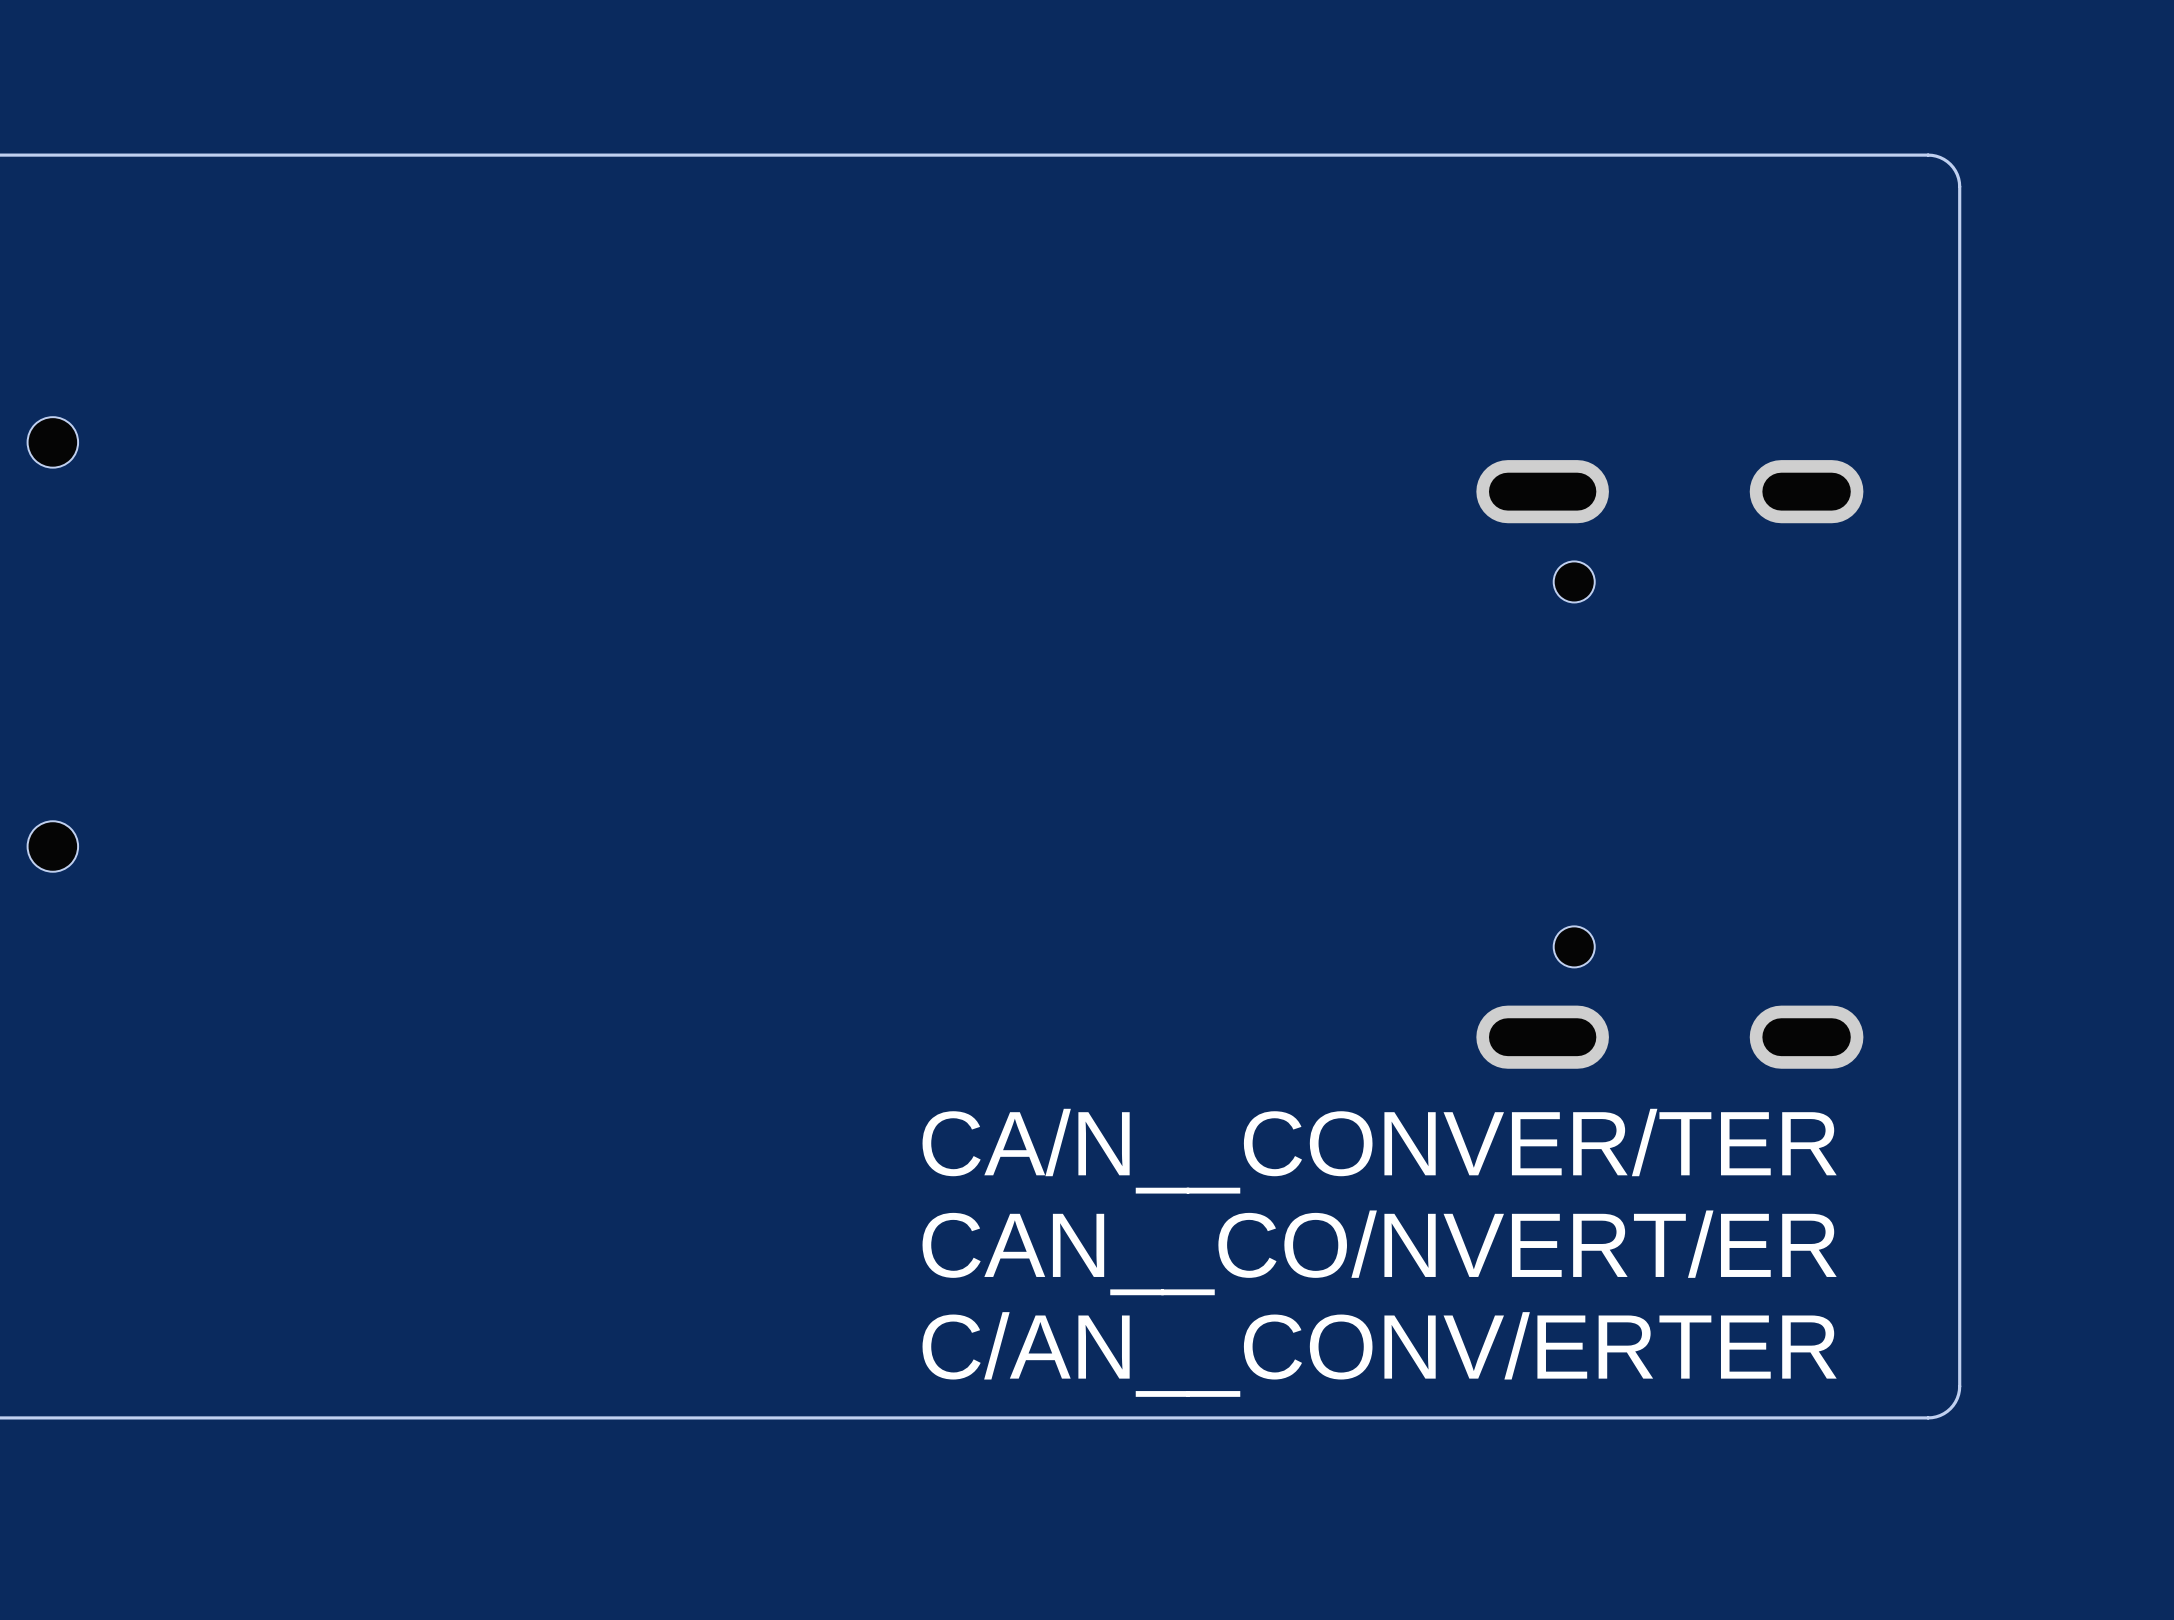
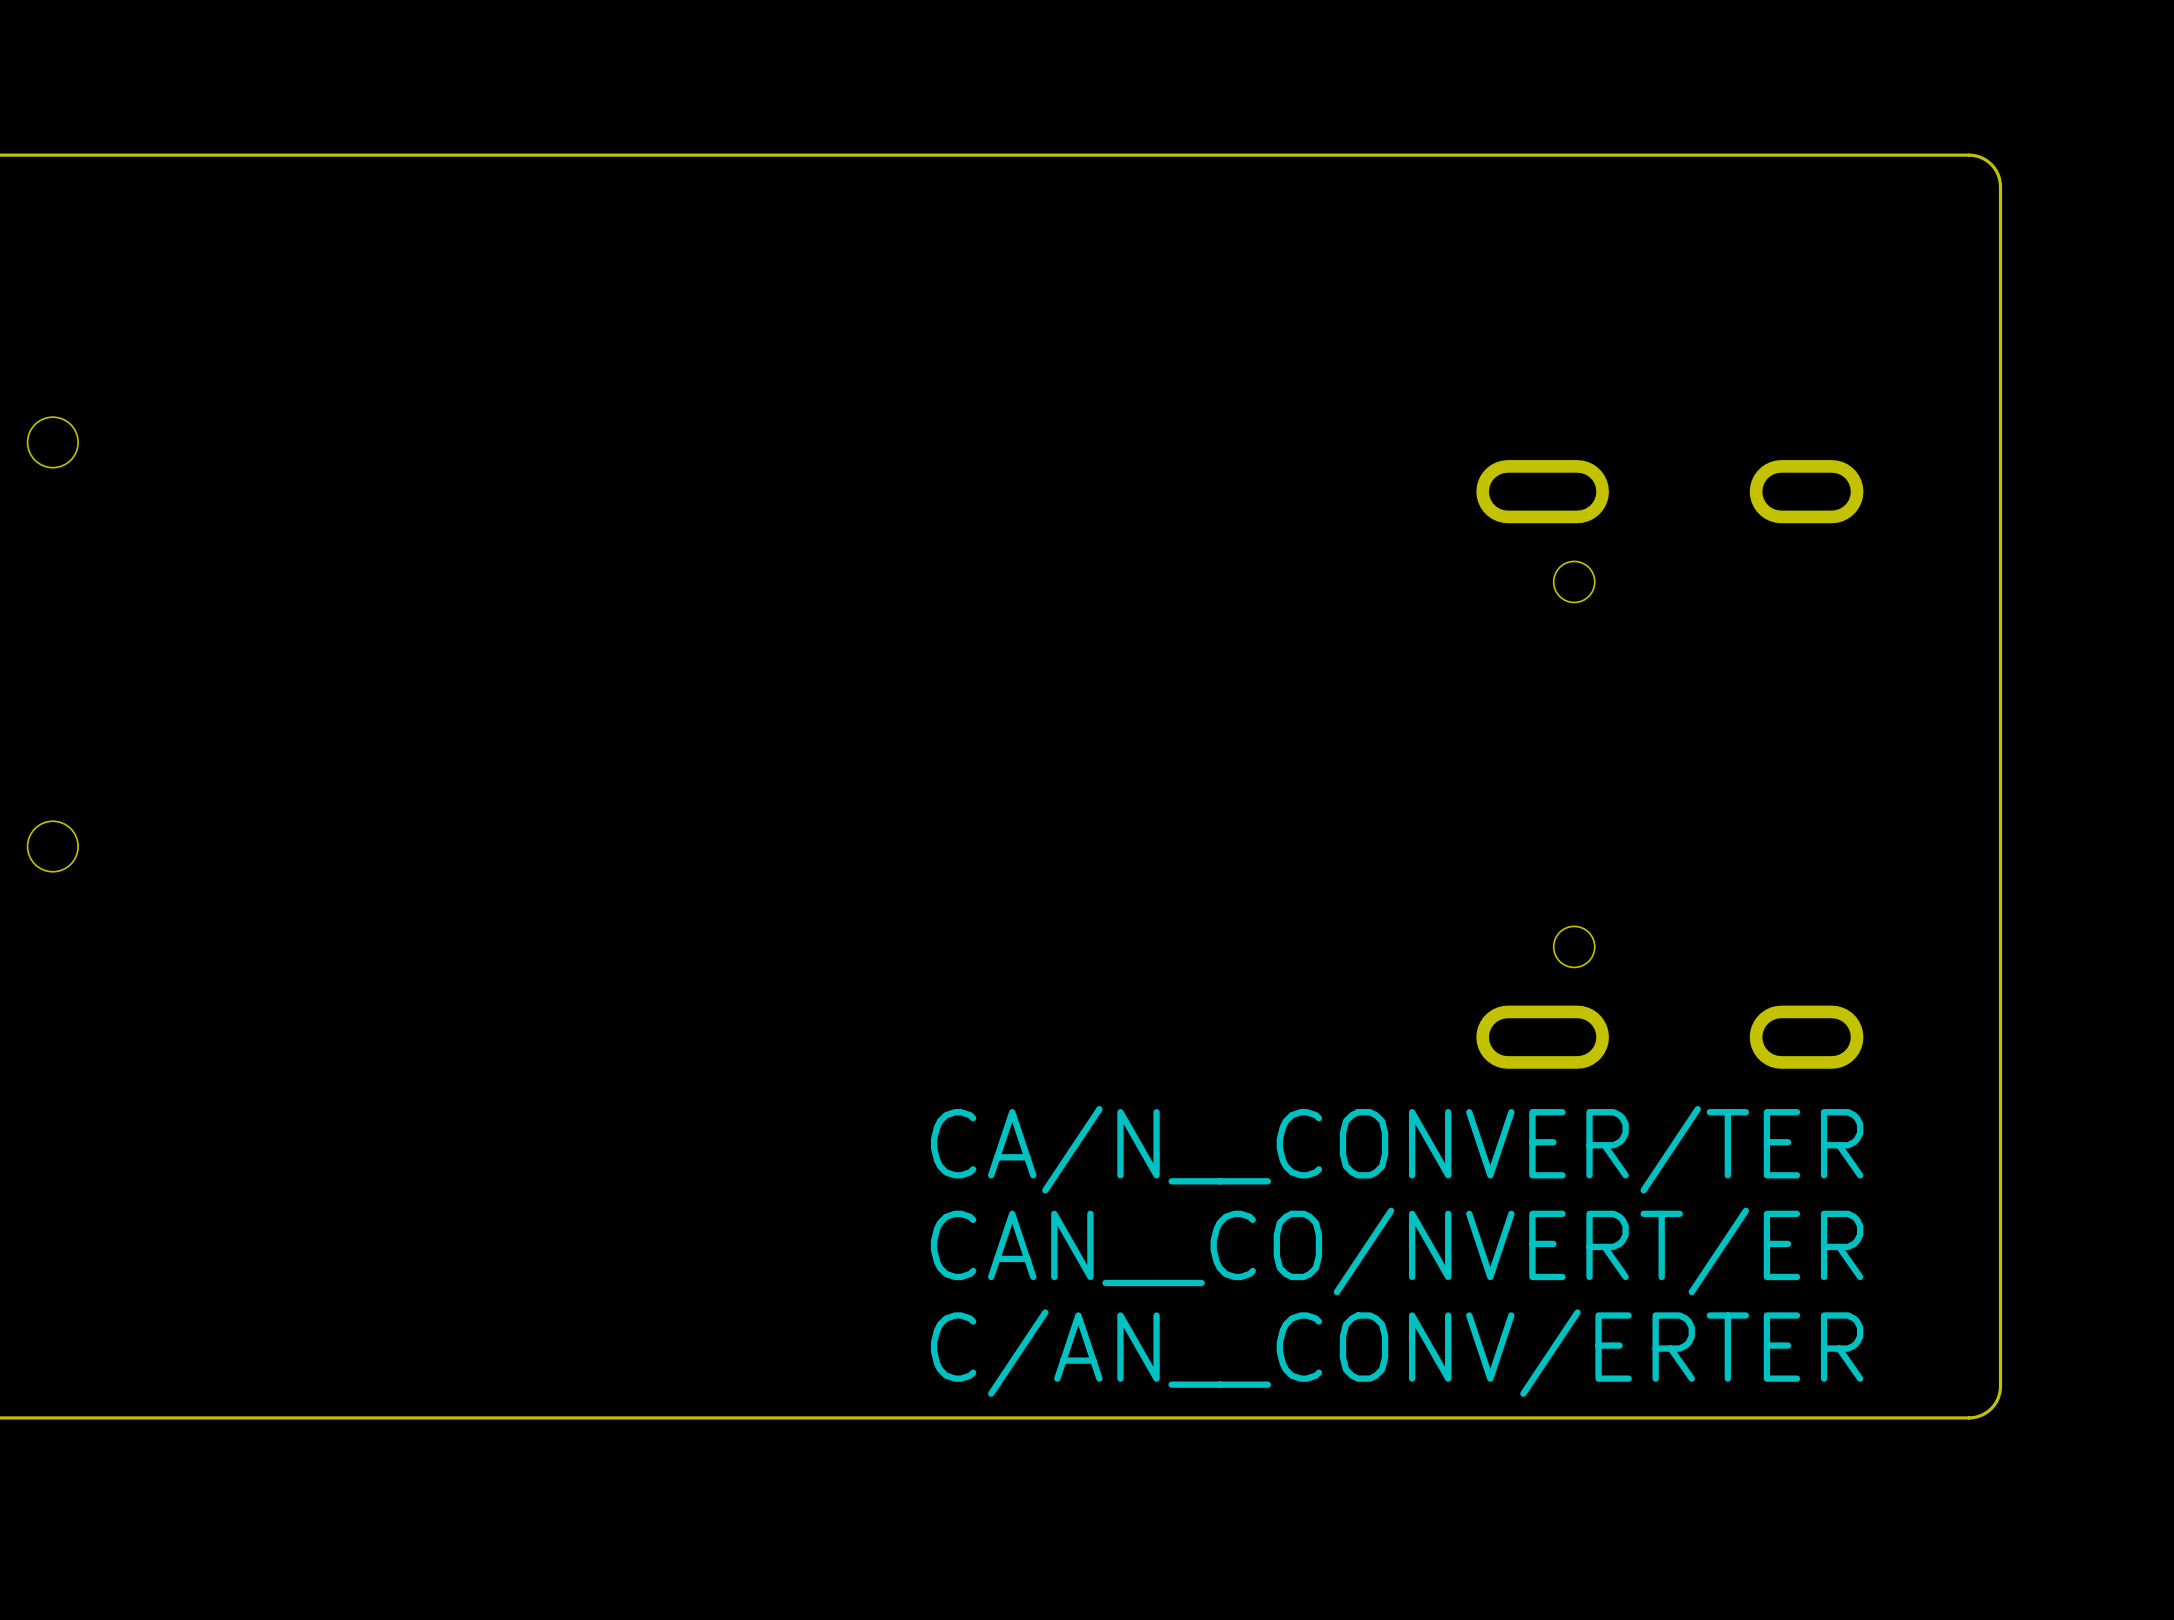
board edge: (1928, 155) (1940, 157) (1950, 164) (1957, 174) (1959, 186) (1959, 1386) (1957, 1398) (1950, 1408) (1940, 1415) (1928, 1417) -> (1968, 155) (1981, 157) (1991, 164) (1998, 174) (2000, 186) (2000, 1386) (1996, 1402) (1991, 1408) (1981, 1415) (1968, 1417) (1928, 1417)
board edge: none -> (1968, 155) (1928, 155)

